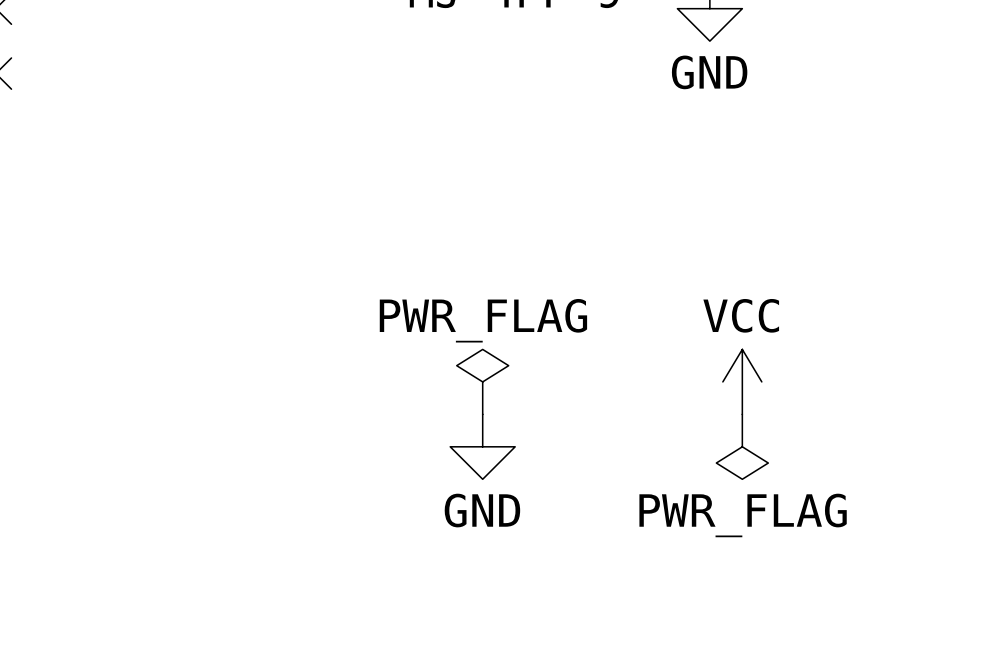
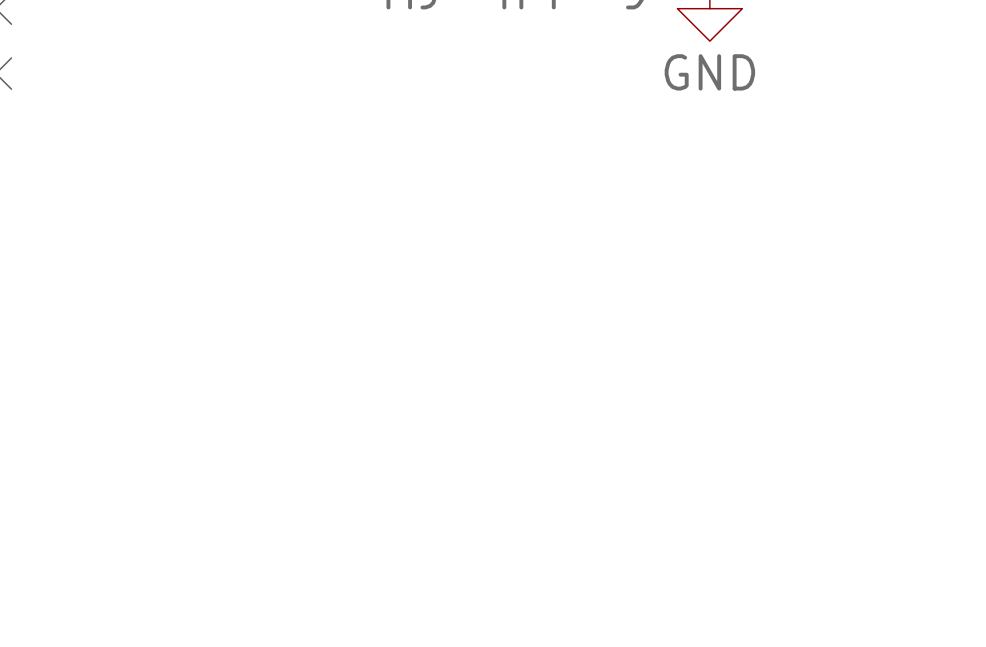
power symbol: PWR_FLAG (482, 381) -> none
power symbol: VCC (742, 381) -> none
power symbol: GND (482, 446) -> none
power symbol: PWR_FLAG (742, 446) -> none

